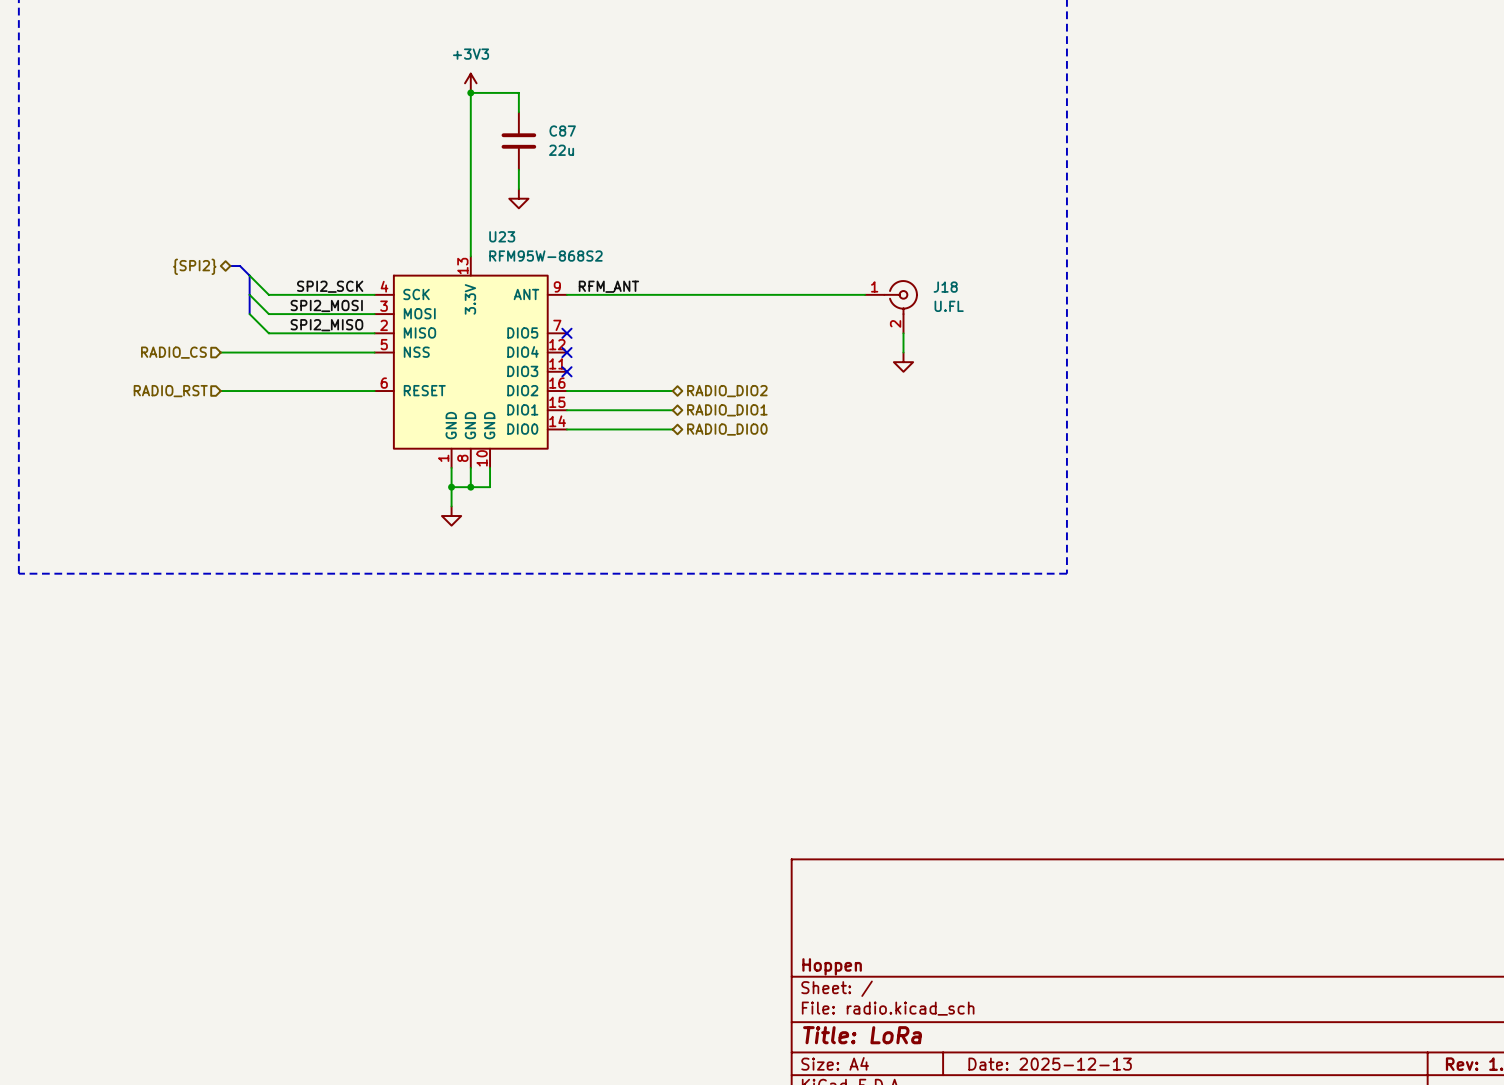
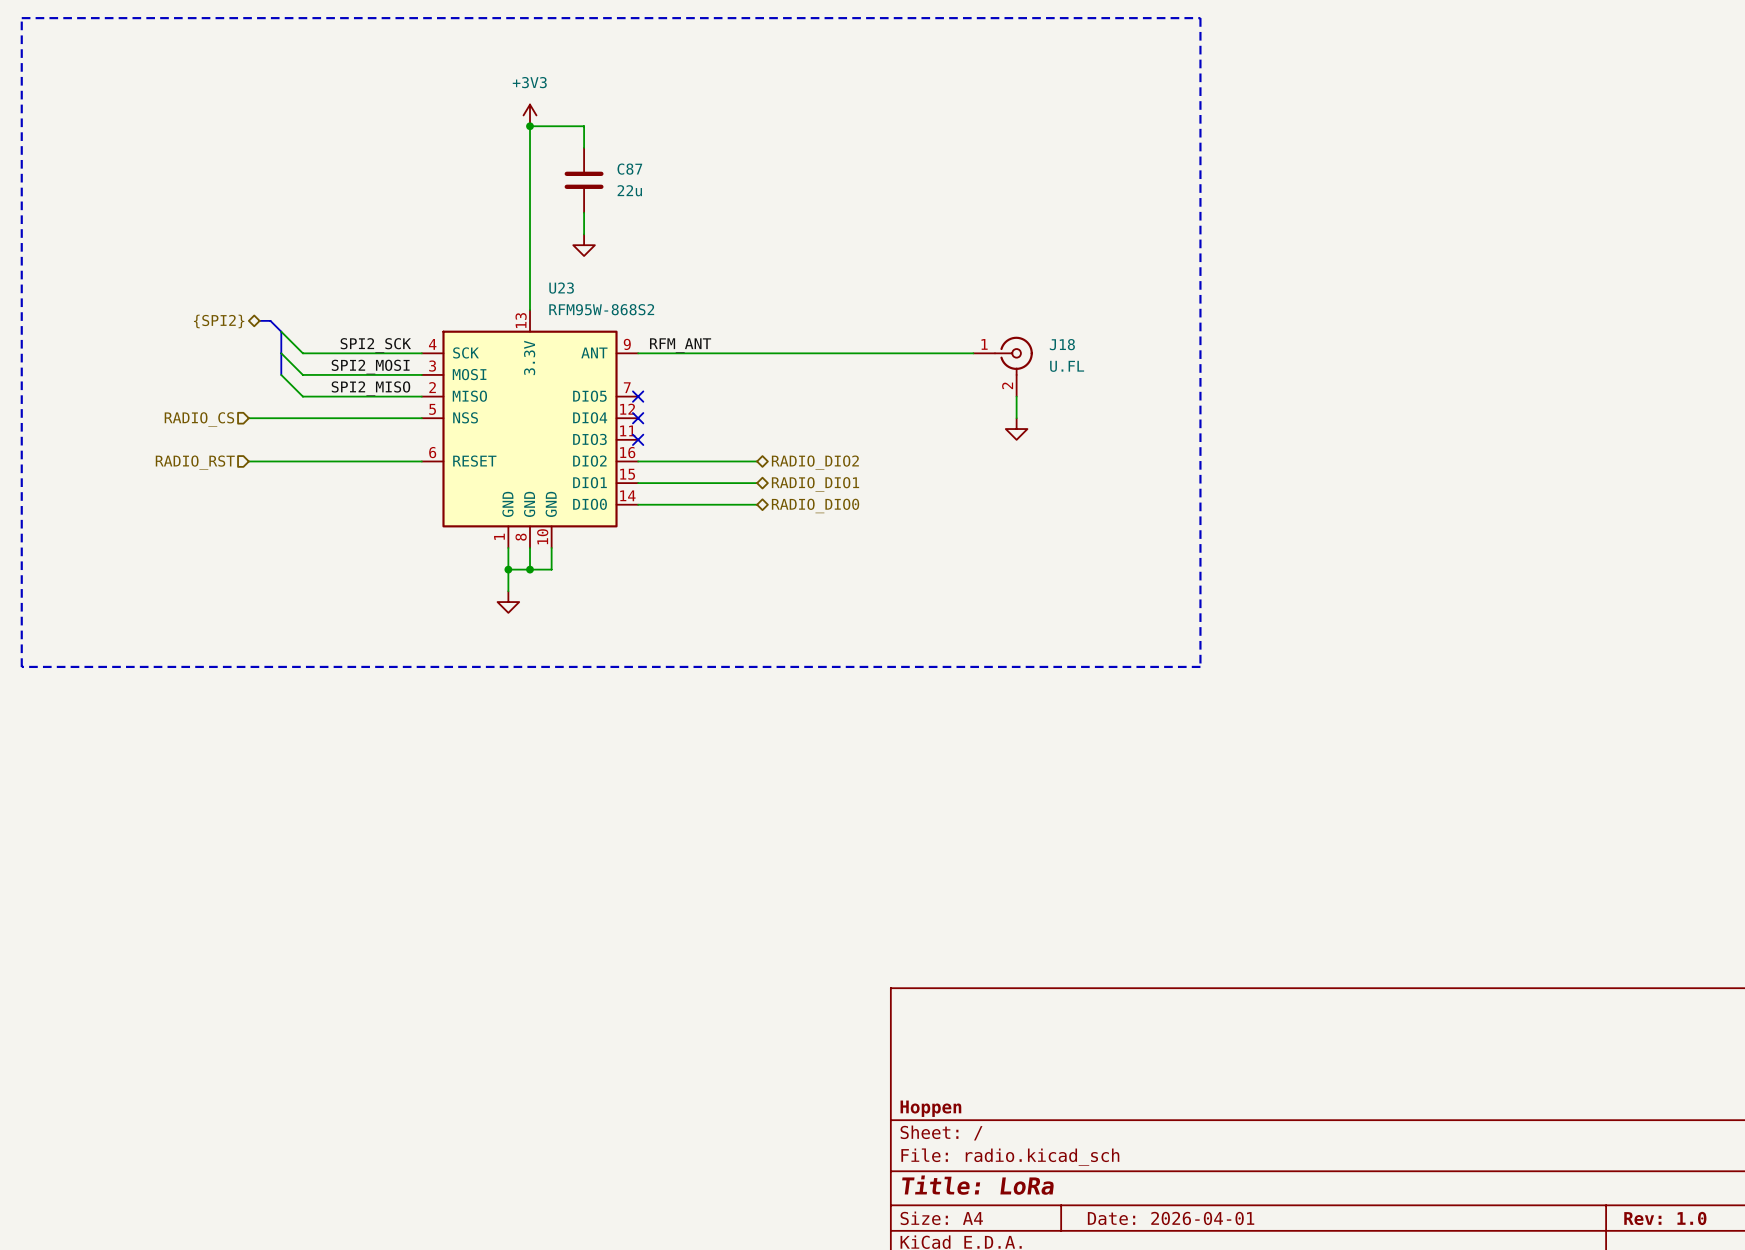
title block: Date: 2025-12-13 (1050, 1064) -> Date: 2026-04-01 (1171, 1218)

